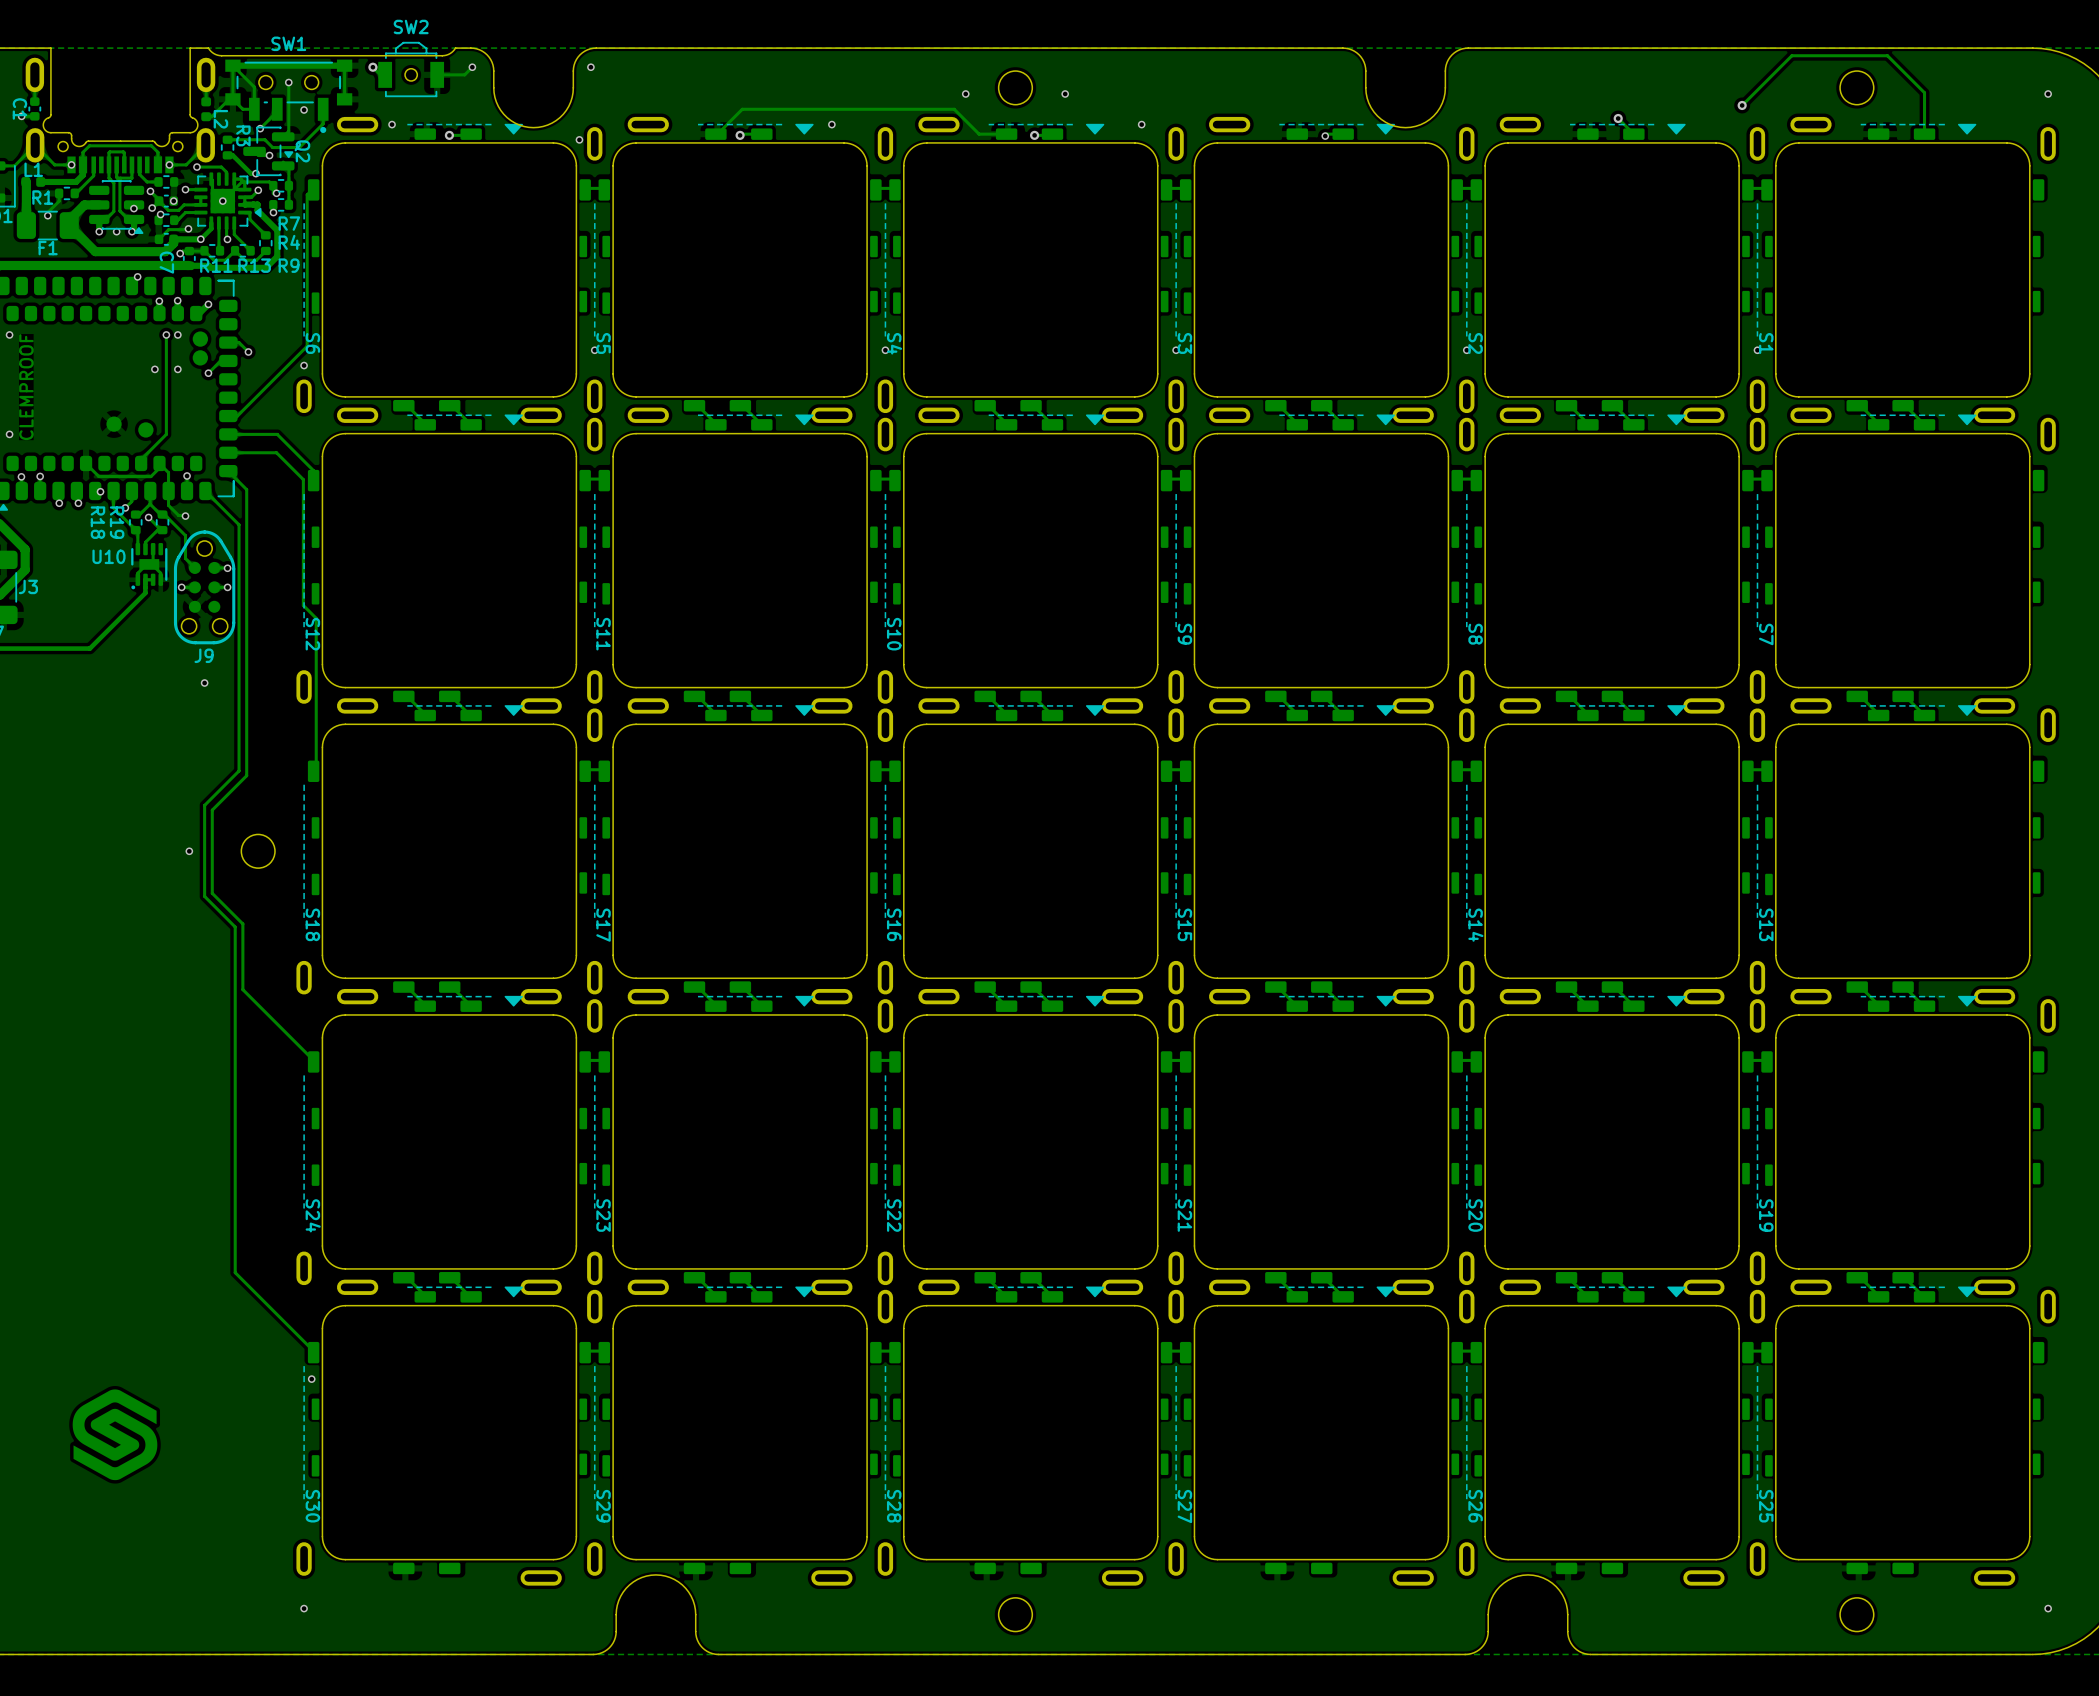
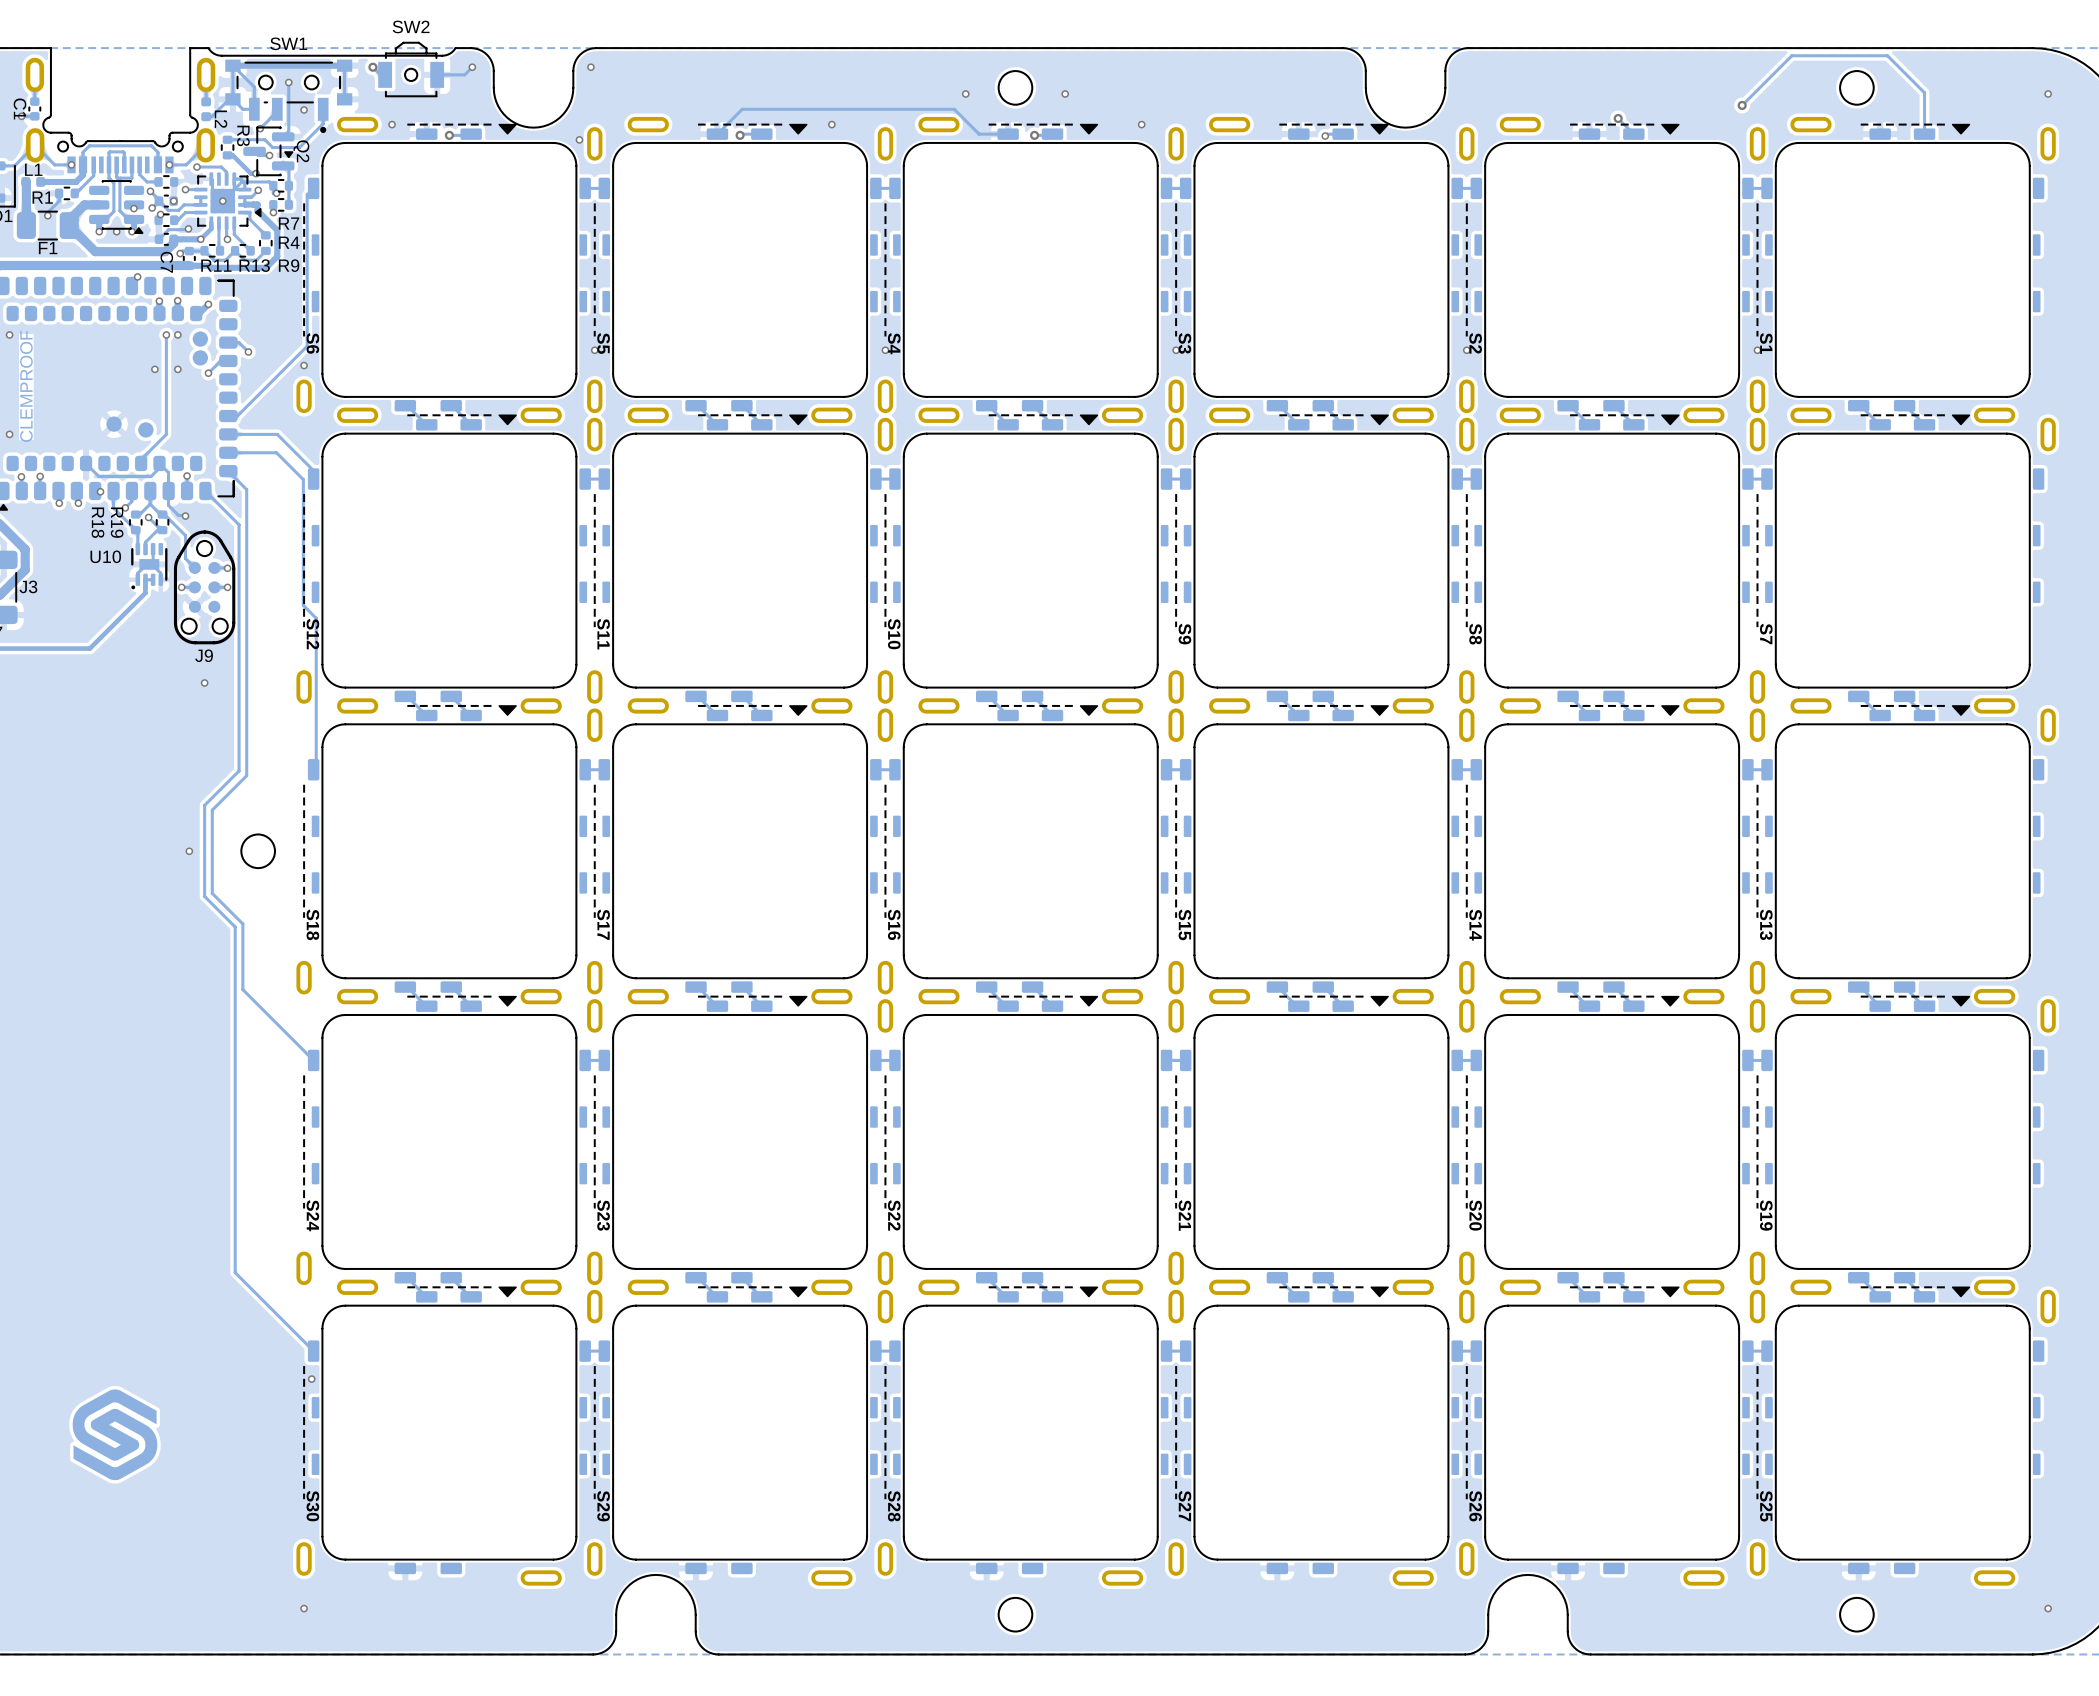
S6 footprint: [296, 116, 603, 423] -> [296, 116, 603, 423]
S5 footprint: [587, 116, 894, 423] -> [587, 116, 894, 423]
S4 footprint: [877, 116, 1184, 423] -> [877, 116, 1184, 423]
S3 footprint: [1168, 116, 1475, 423] -> [1168, 116, 1475, 423]
S2 footprint: [1459, 116, 1766, 423] -> [1459, 116, 1766, 423]
S1 footprint: [1749, 116, 2056, 423] -> [1749, 116, 2056, 423]
S12 footprint: [296, 407, 603, 714] -> [296, 407, 603, 714]
S11 footprint: [587, 407, 894, 714] -> [587, 407, 894, 714]
S10 footprint: [877, 407, 1184, 714] -> [877, 407, 1184, 714]
S9 footprint: [1168, 407, 1475, 714] -> [1168, 407, 1475, 714]
S8 footprint: [1459, 407, 1766, 714] -> [1459, 407, 1766, 714]
S7 footprint: [1749, 407, 2056, 714] -> [1749, 407, 2056, 714]
S18 footprint: [296, 698, 603, 1005] -> [296, 698, 603, 1005]
S17 footprint: [587, 698, 894, 1005] -> [587, 698, 894, 1005]
S16 footprint: [877, 698, 1184, 1005] -> [877, 698, 1184, 1005]
S15 footprint: [1168, 698, 1475, 1005] -> [1168, 698, 1475, 1005]
S14 footprint: [1459, 698, 1766, 1005] -> [1459, 698, 1766, 1005]
S13 footprint: [1749, 698, 2056, 1005] -> [1749, 698, 2056, 1005]
S24 footprint: [296, 988, 603, 1295] -> [296, 988, 603, 1295]
S23 footprint: [587, 988, 894, 1295] -> [587, 988, 894, 1295]
S22 footprint: [877, 988, 1184, 1295] -> [877, 988, 1184, 1295]
S21 footprint: [1168, 988, 1475, 1295] -> [1168, 988, 1475, 1295]
S20 footprint: [1459, 988, 1766, 1295] -> [1459, 988, 1766, 1295]
S19 footprint: [1749, 988, 2056, 1295] -> [1749, 988, 2056, 1295]
S30 footprint: [296, 1279, 603, 1586] -> [296, 1279, 603, 1586]
S29 footprint: [587, 1279, 894, 1586] -> [587, 1279, 894, 1586]
S28 footprint: [877, 1279, 1184, 1586] -> [877, 1279, 1184, 1586]
S27 footprint: [1168, 1279, 1475, 1586] -> [1168, 1279, 1475, 1586]
S26 footprint: [1459, 1279, 1766, 1586] -> [1459, 1279, 1766, 1586]
S25 footprint: [1749, 1279, 2056, 1586] -> [1749, 1279, 2056, 1586]

